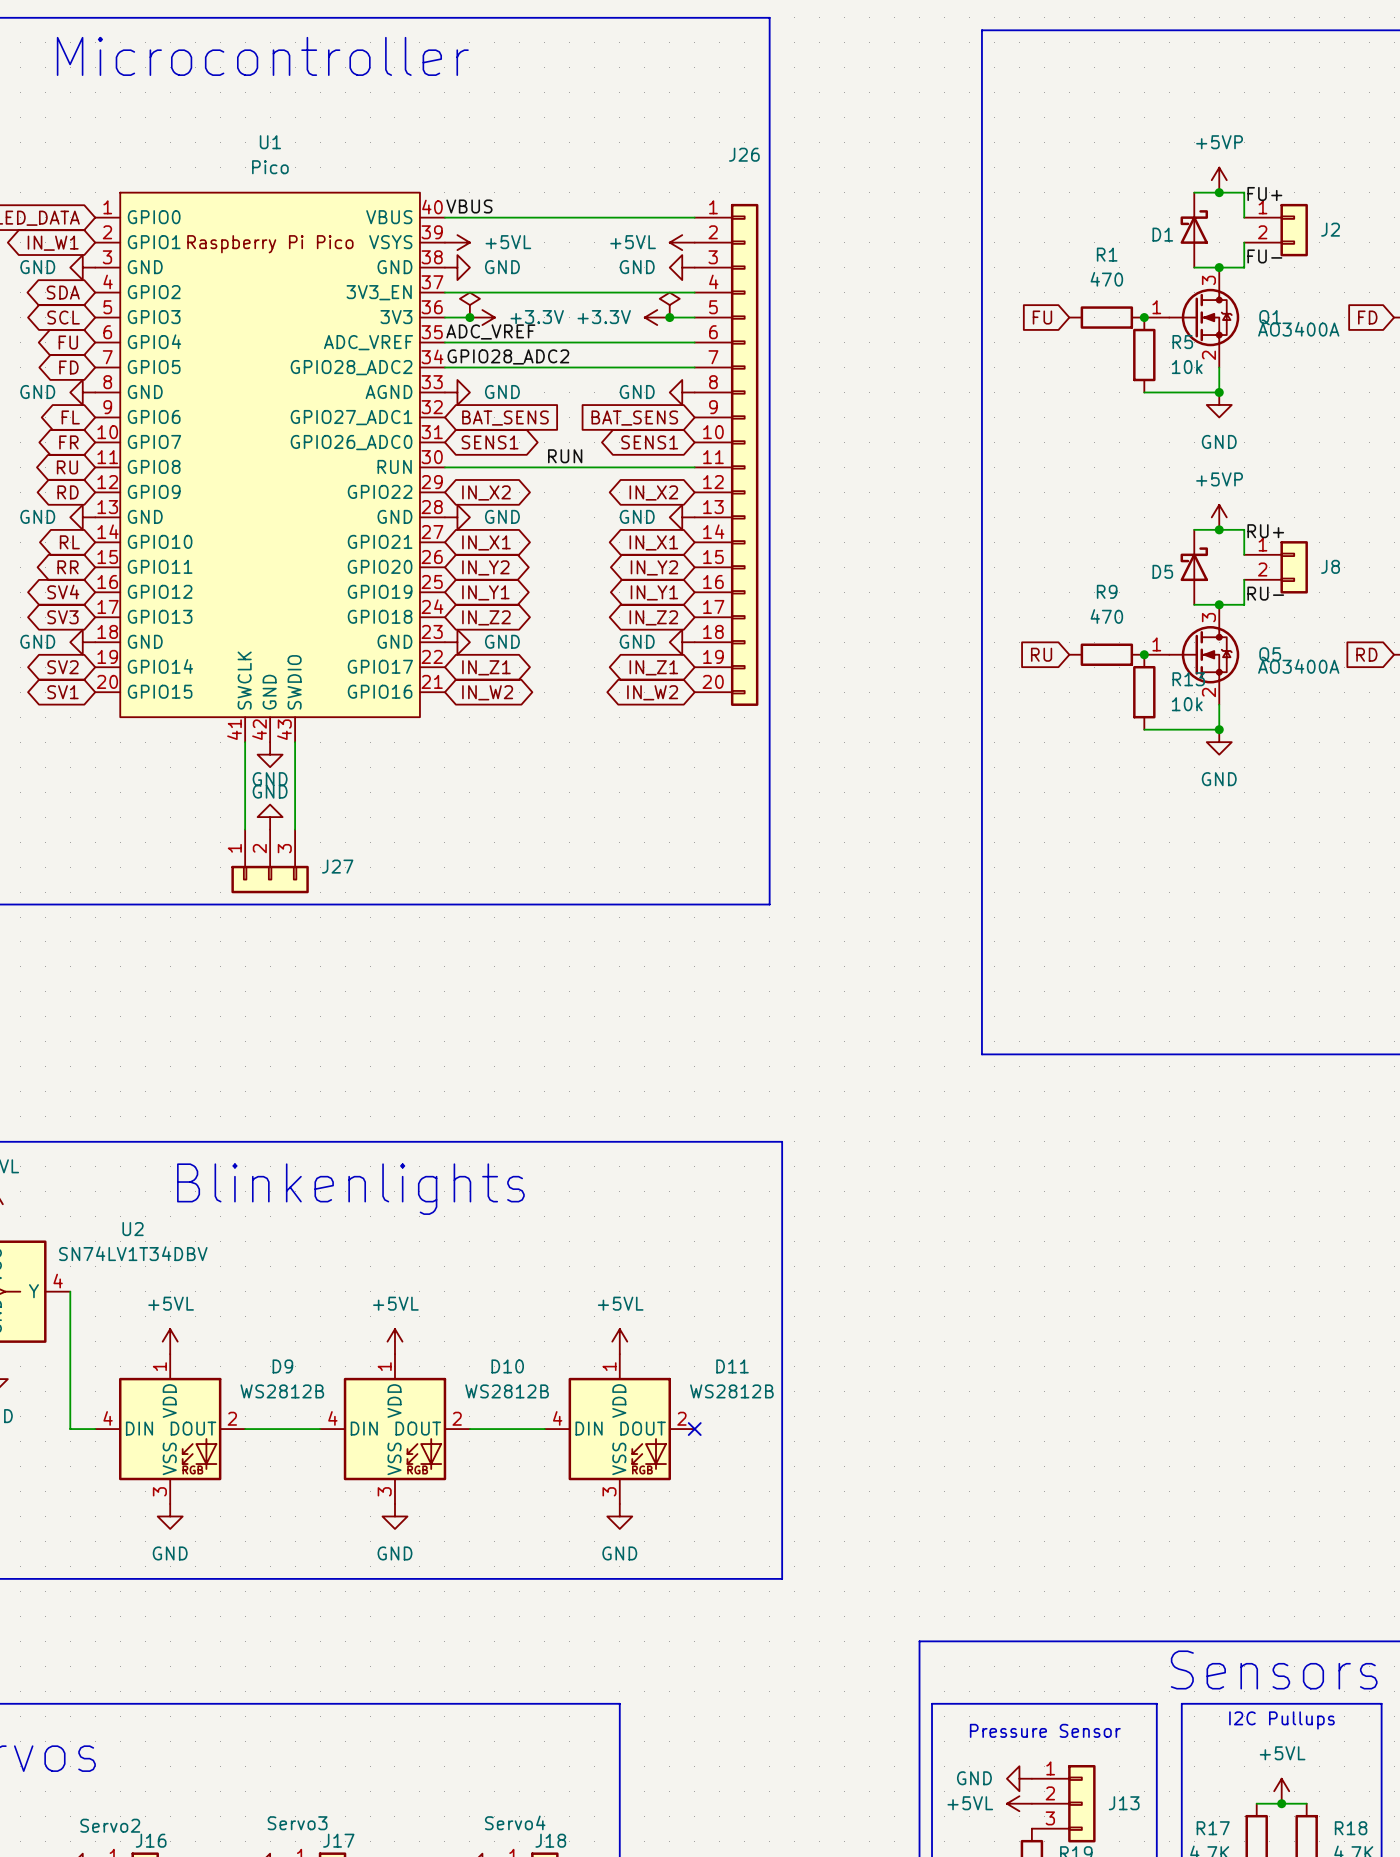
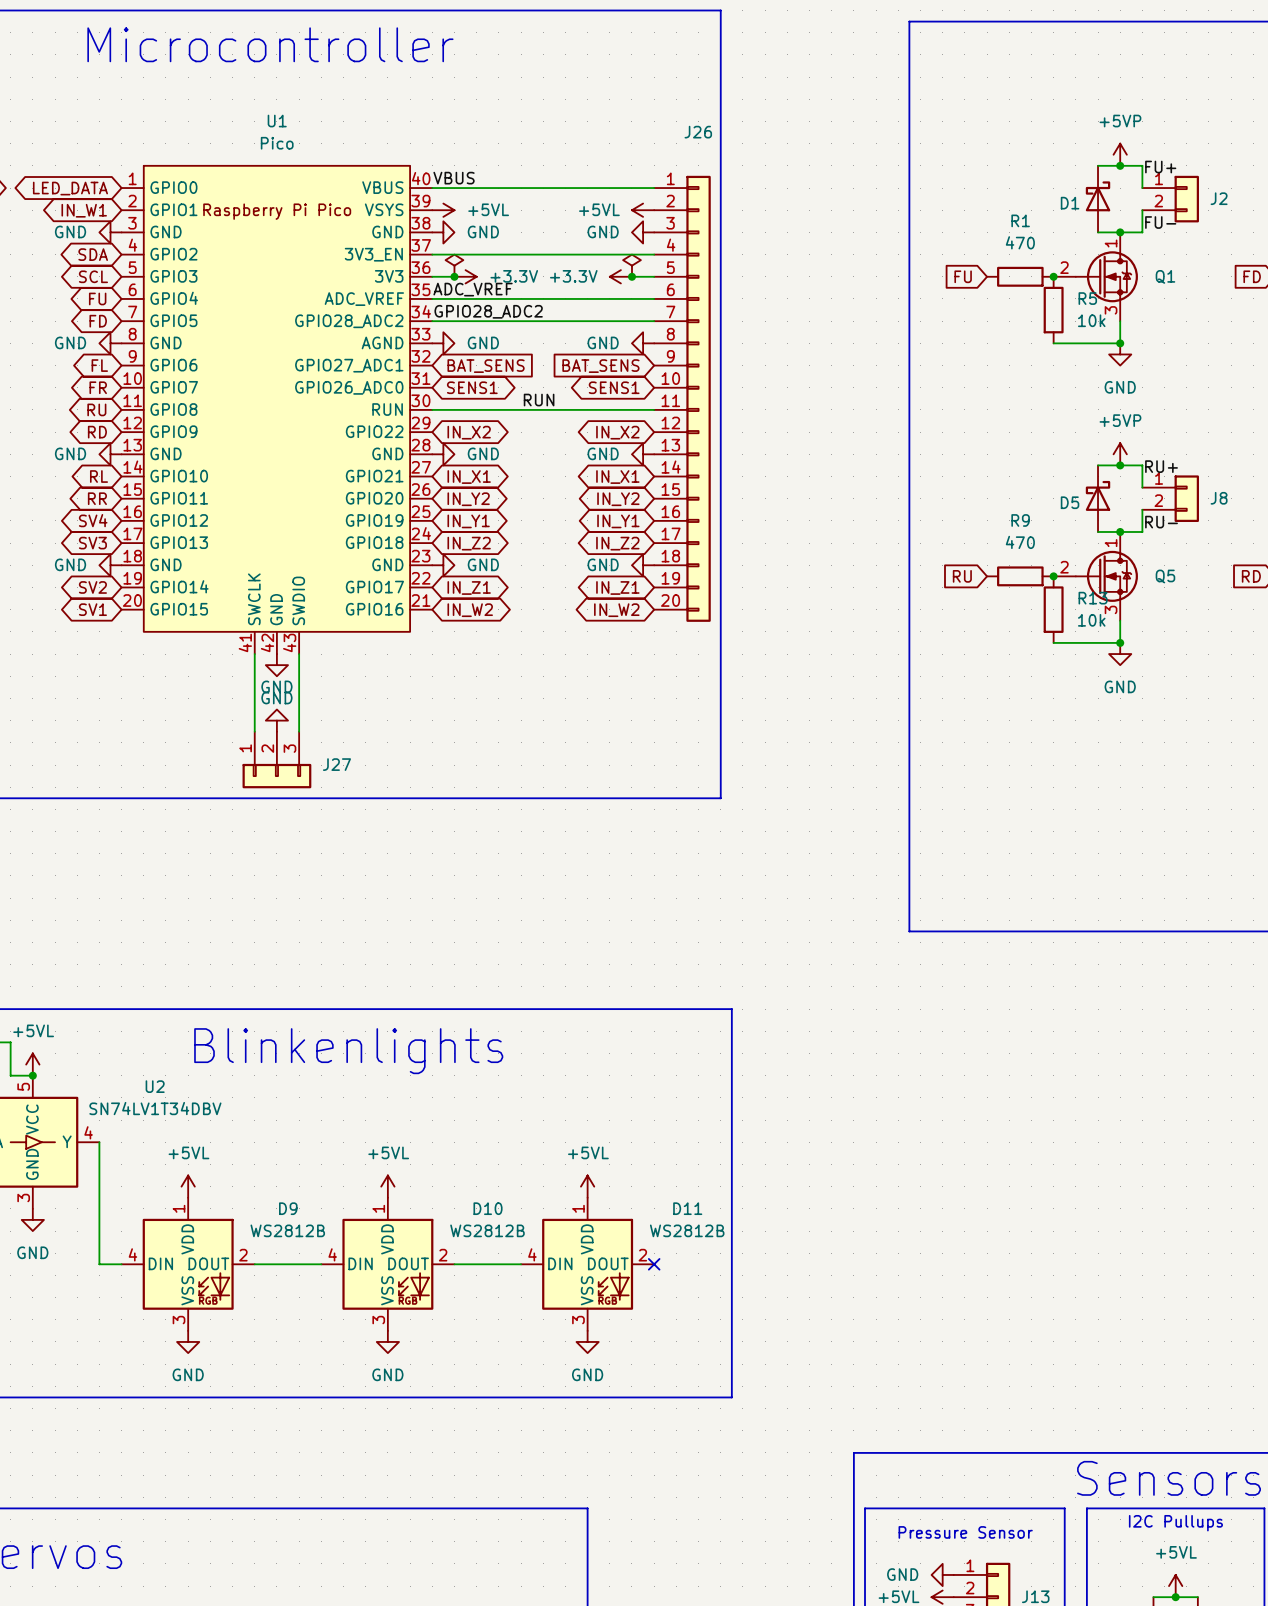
Q1 symbol: [1144, 267, 1240, 368] -> [1053, 232, 1138, 322]
Q1 value: AO3400A (1298, 329) -> none
Q5 symbol: [1144, 604, 1240, 705] -> [1053, 531, 1138, 621]
Q5 value: AO3400A (1298, 666) -> none

